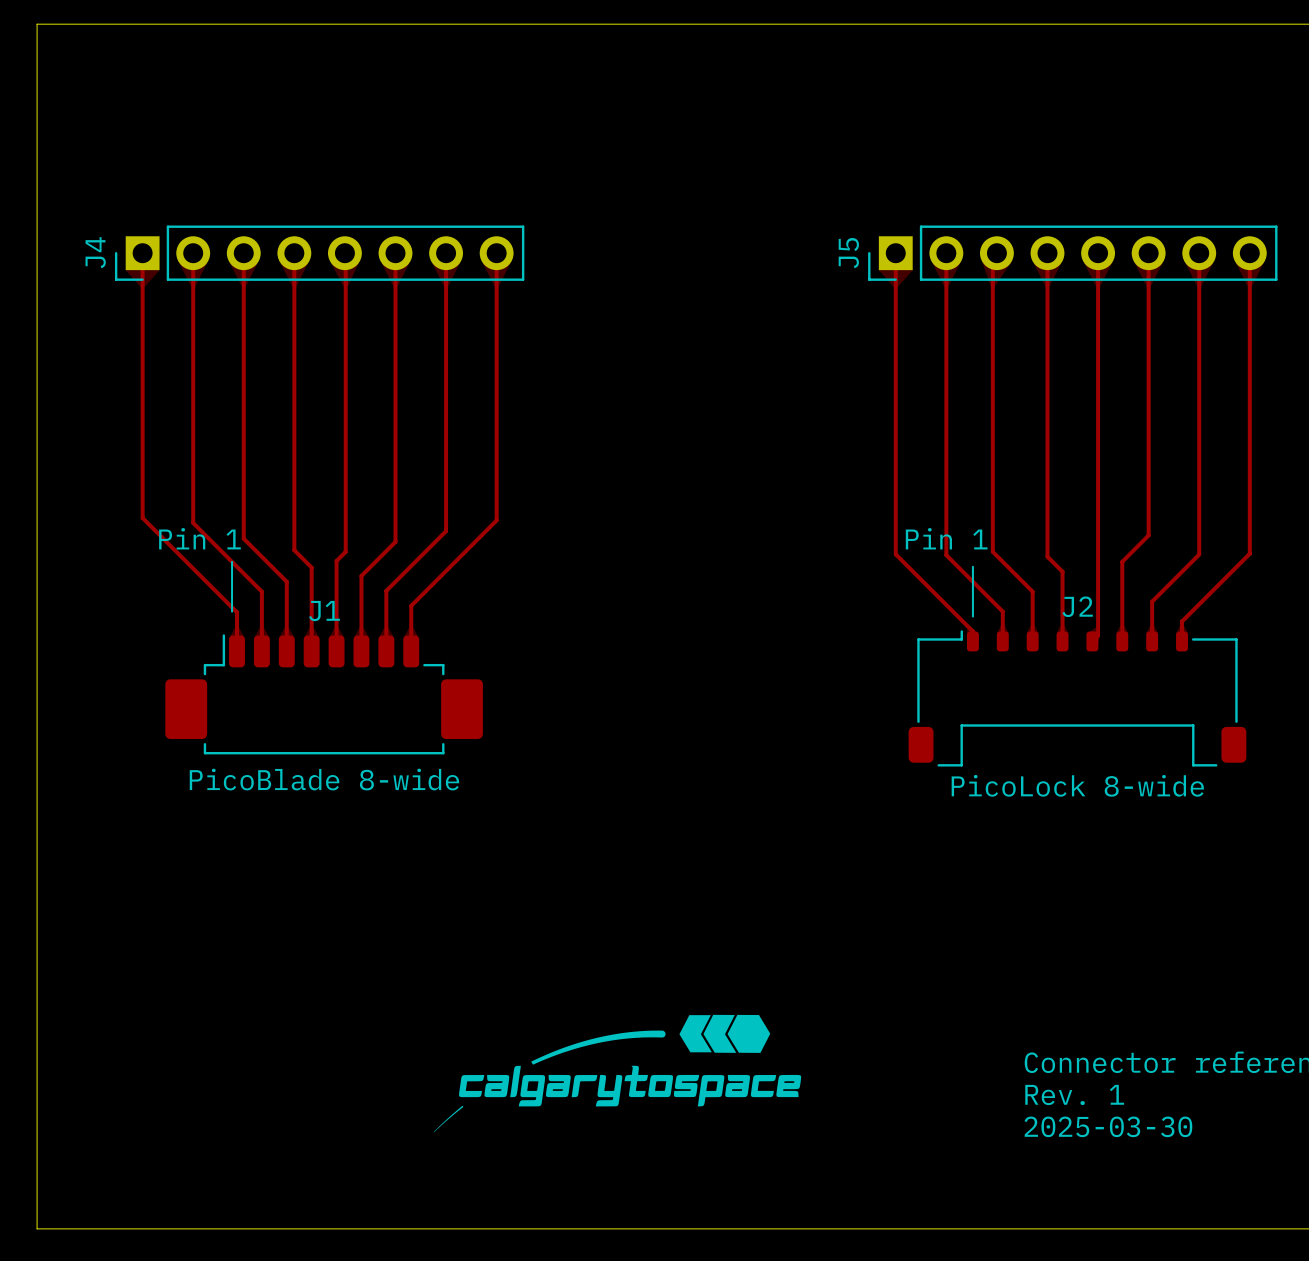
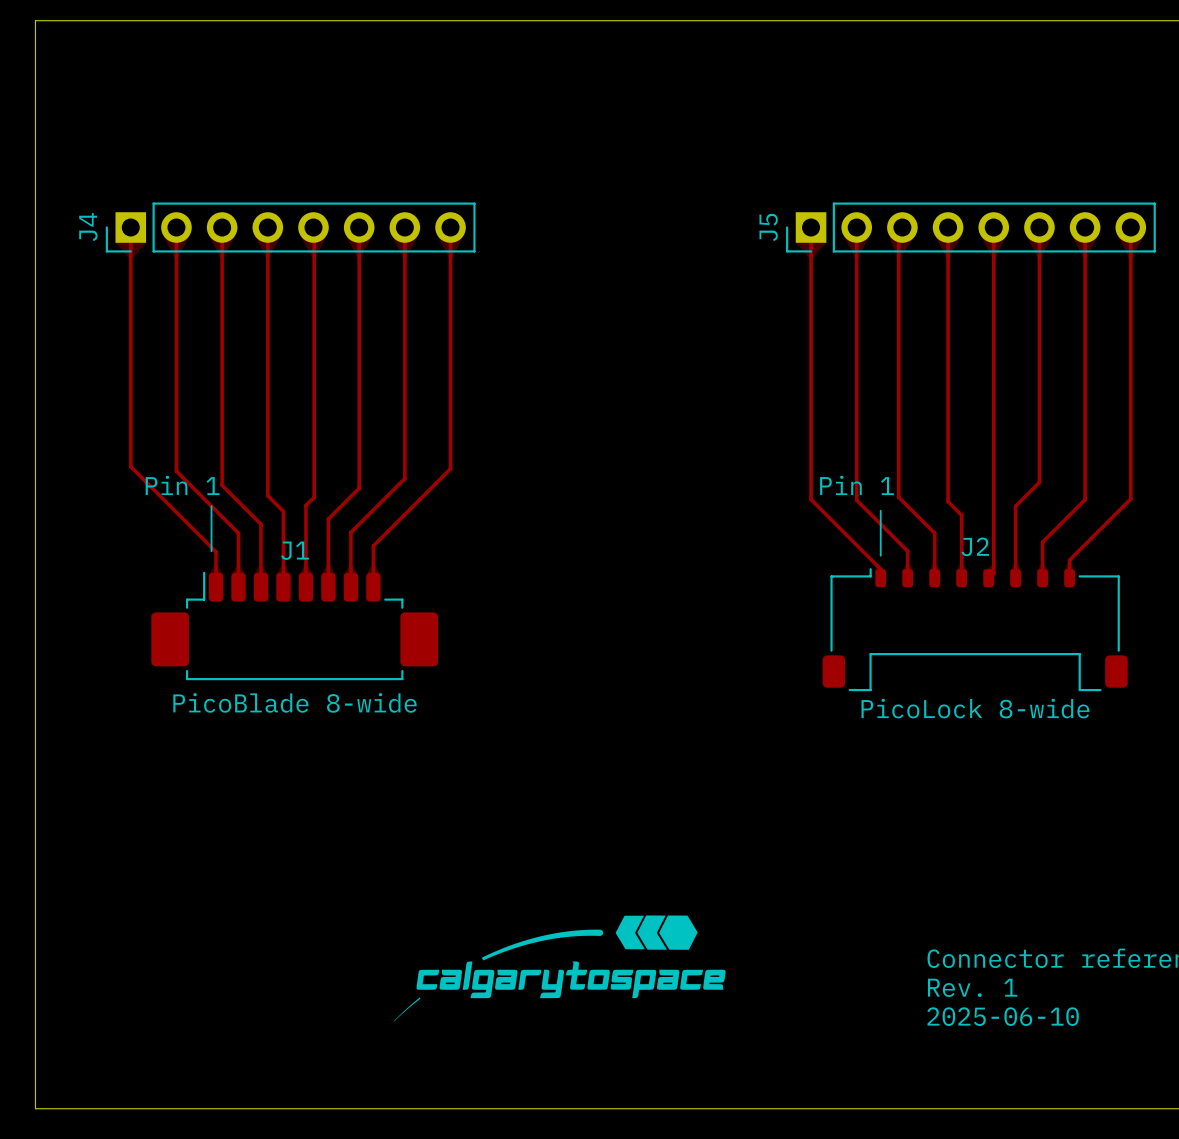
text: 2025-03-30 (1108, 1126) -> 2025-06-10 (1003, 1016)

